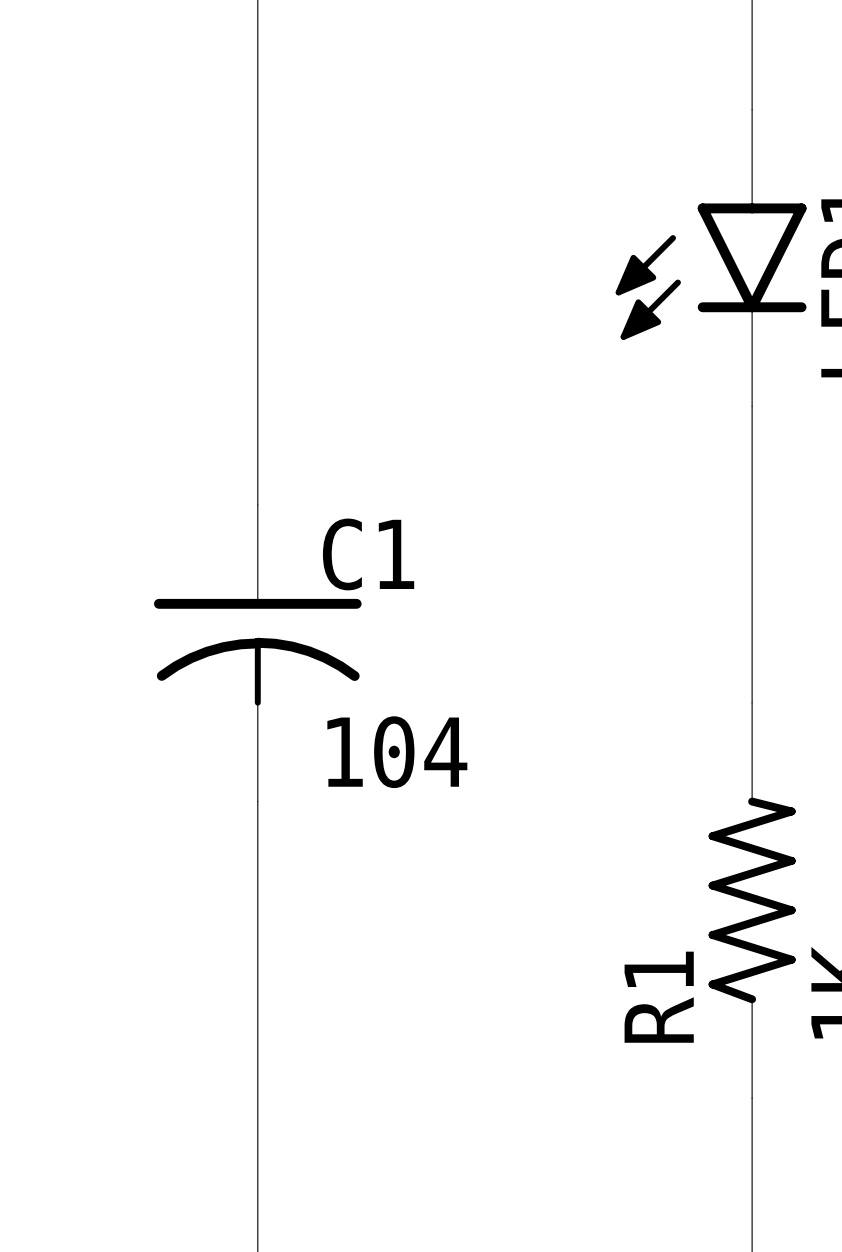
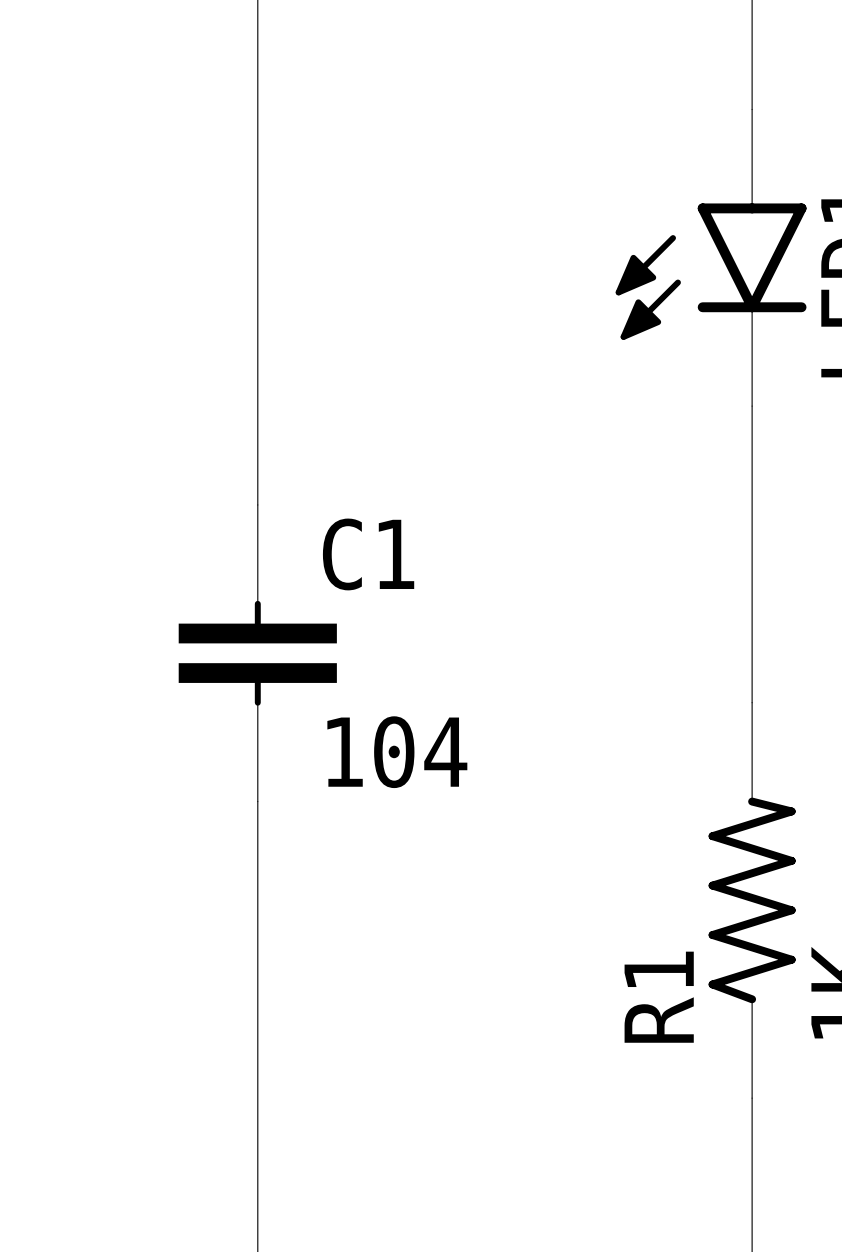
C1 symbol: [153, 504, 362, 802] -> [178, 504, 337, 802]

